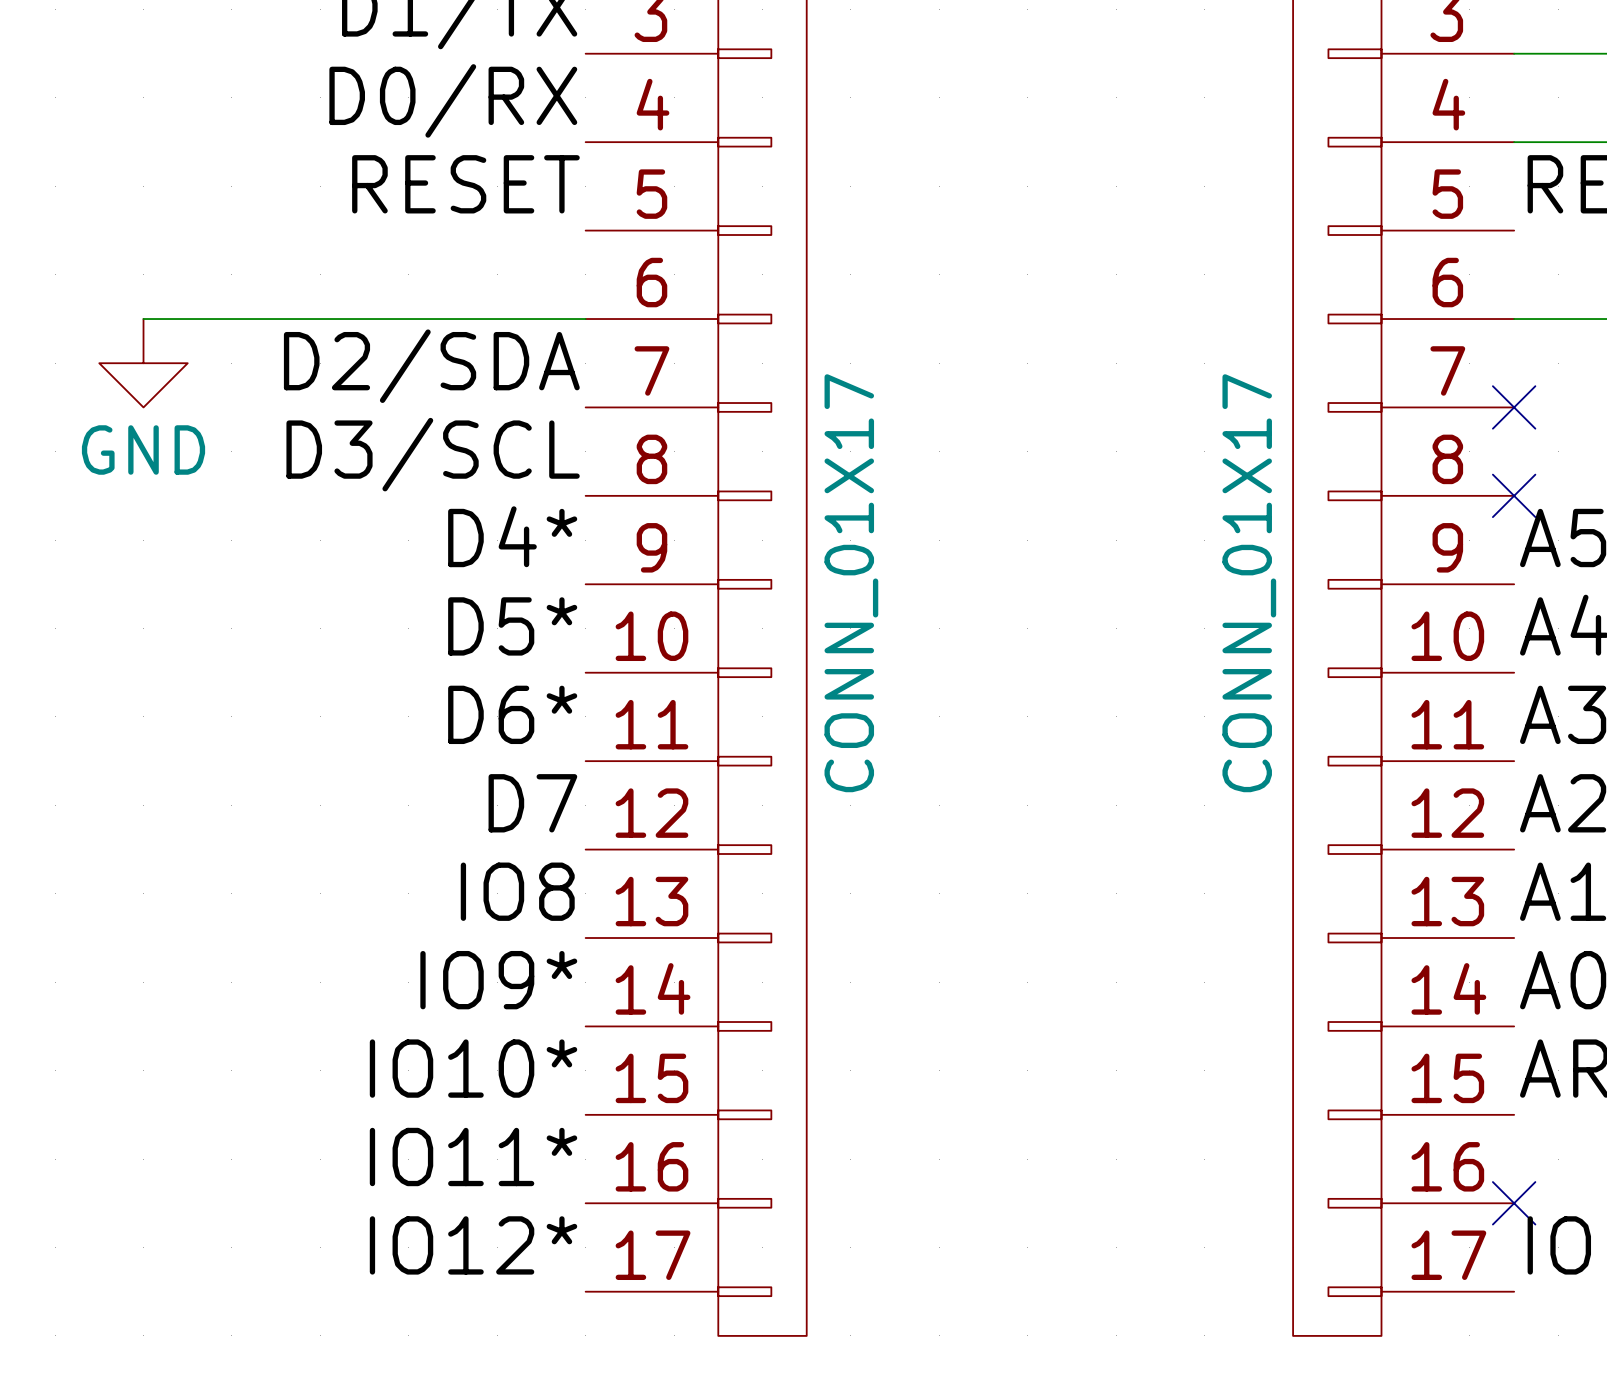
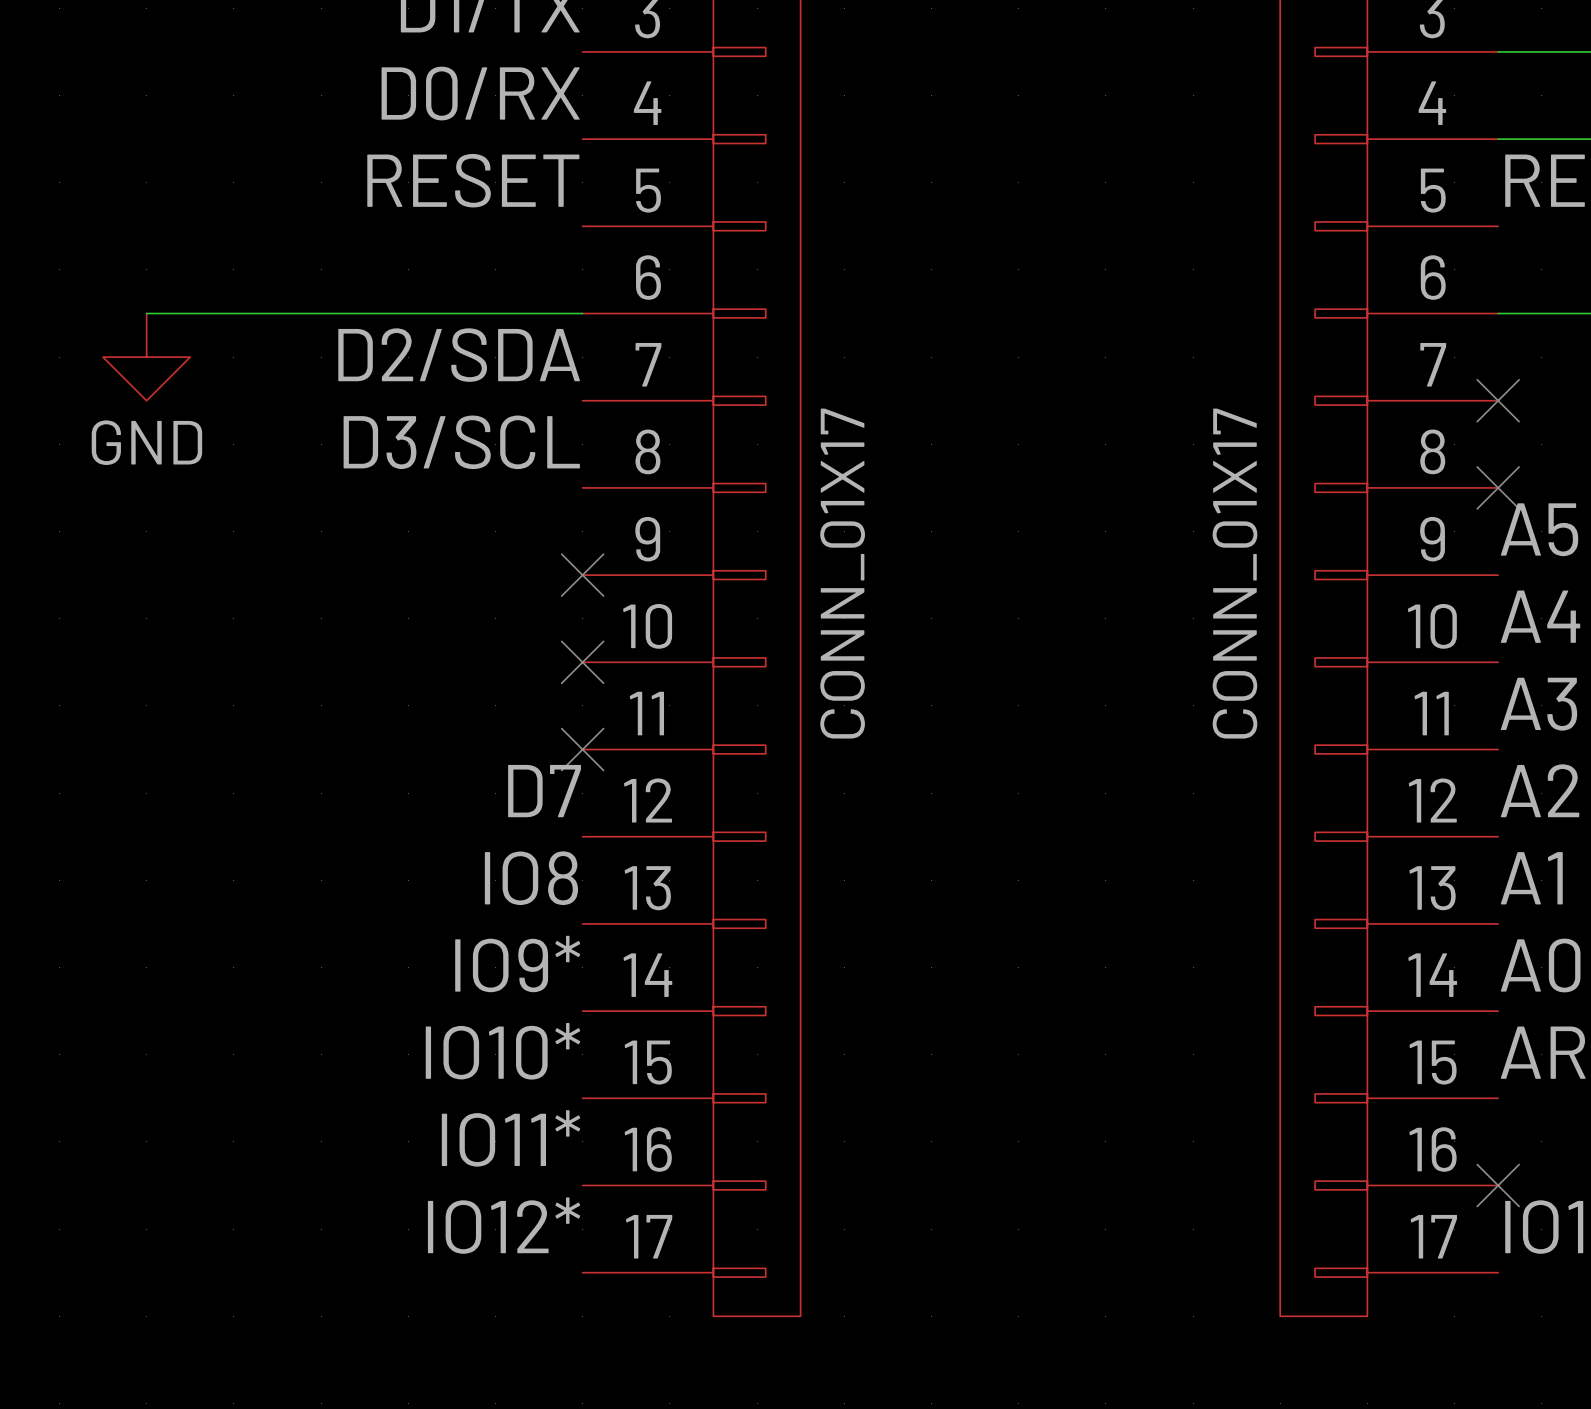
label: D4* (512, 536) -> none
no-connect mark: none -> (582, 575)
label: D5* (512, 626) -> none
no-connect mark: none -> (582, 662)
label: D6* (512, 714) -> none
no-connect mark: none -> (582, 749)

